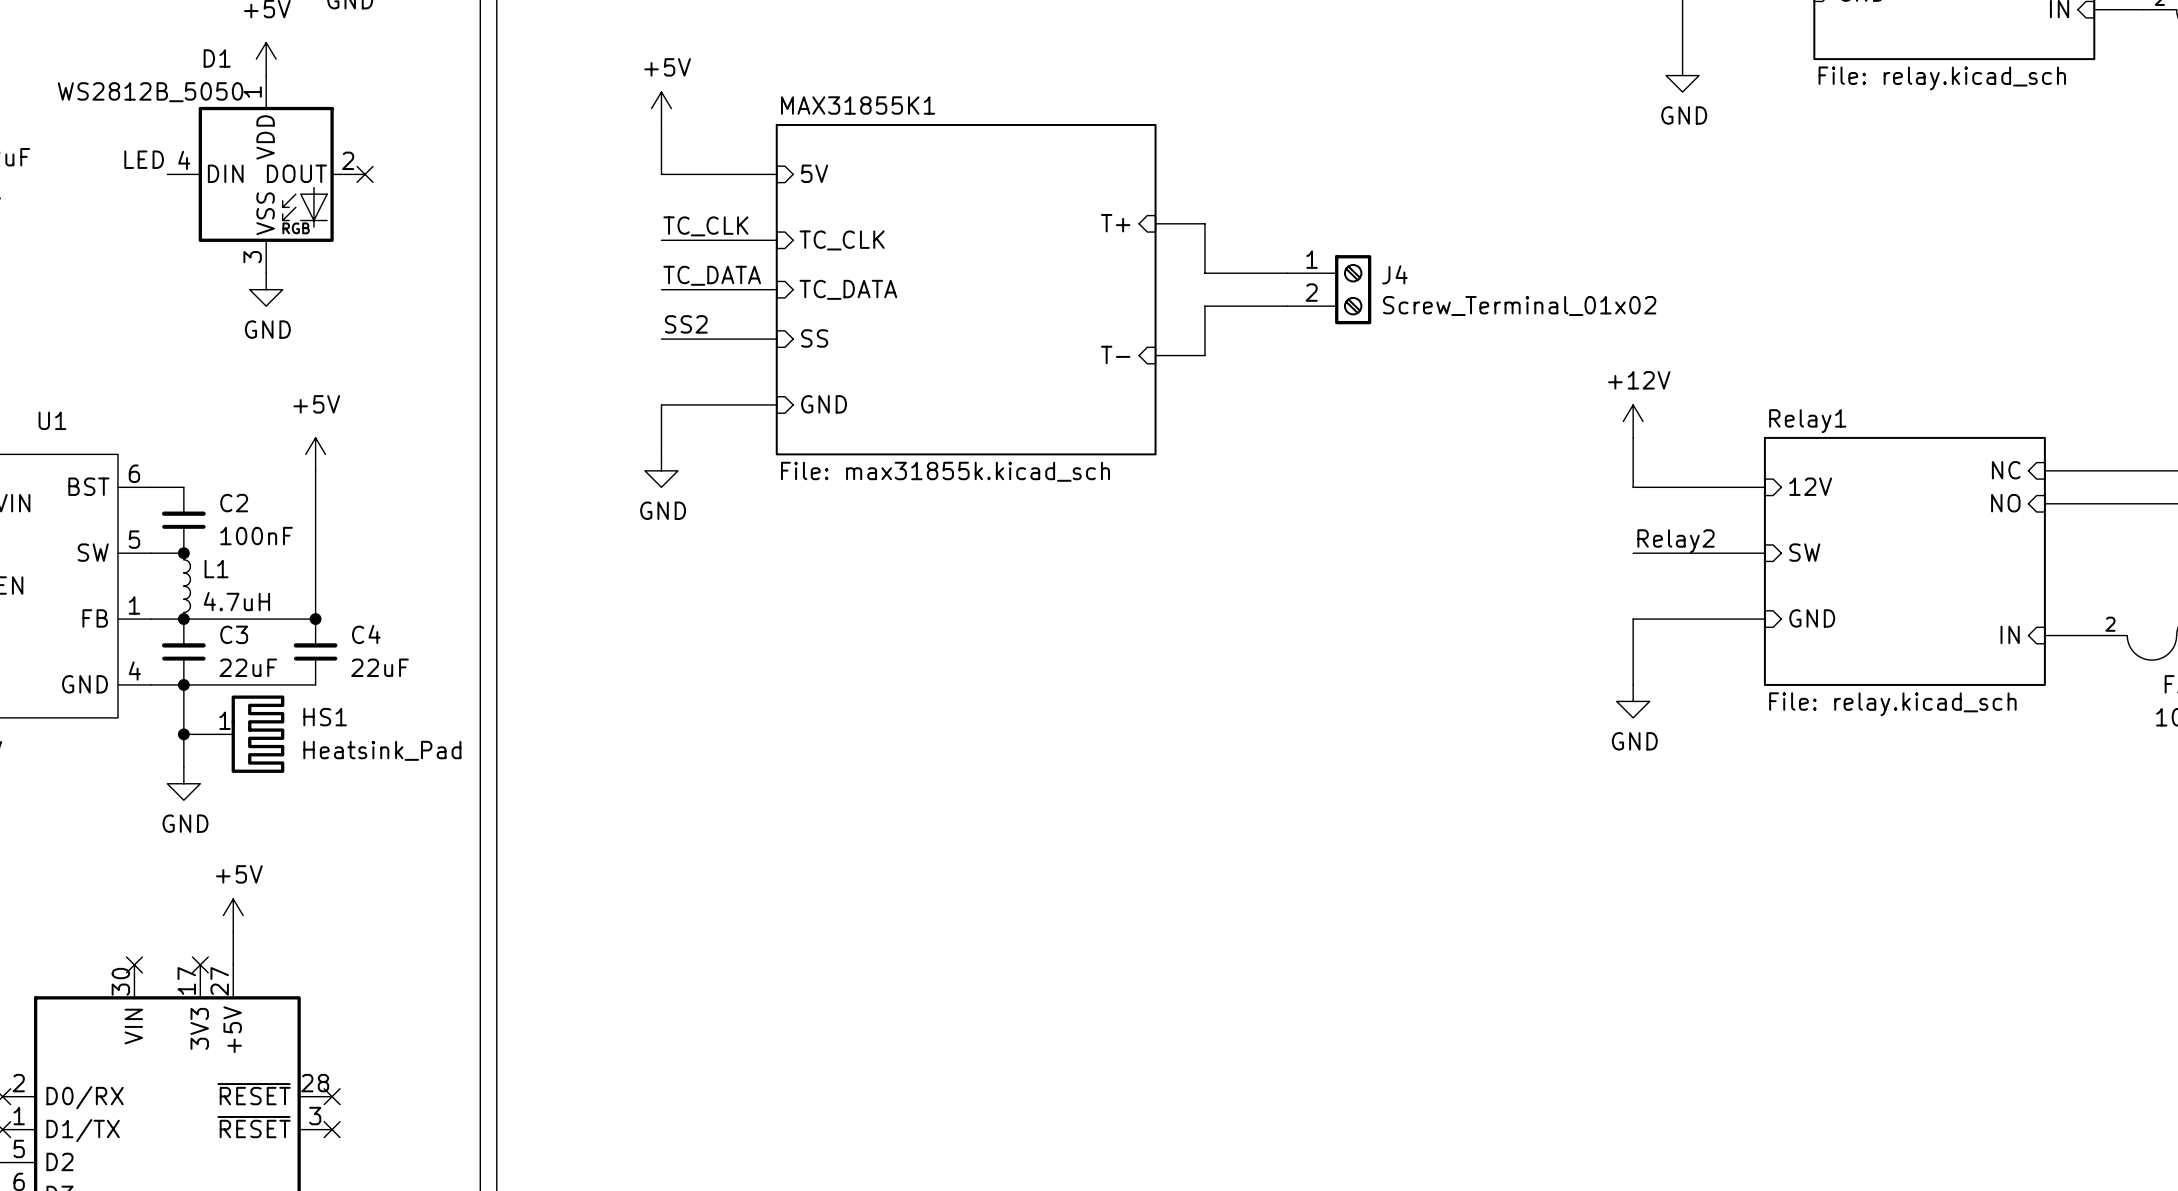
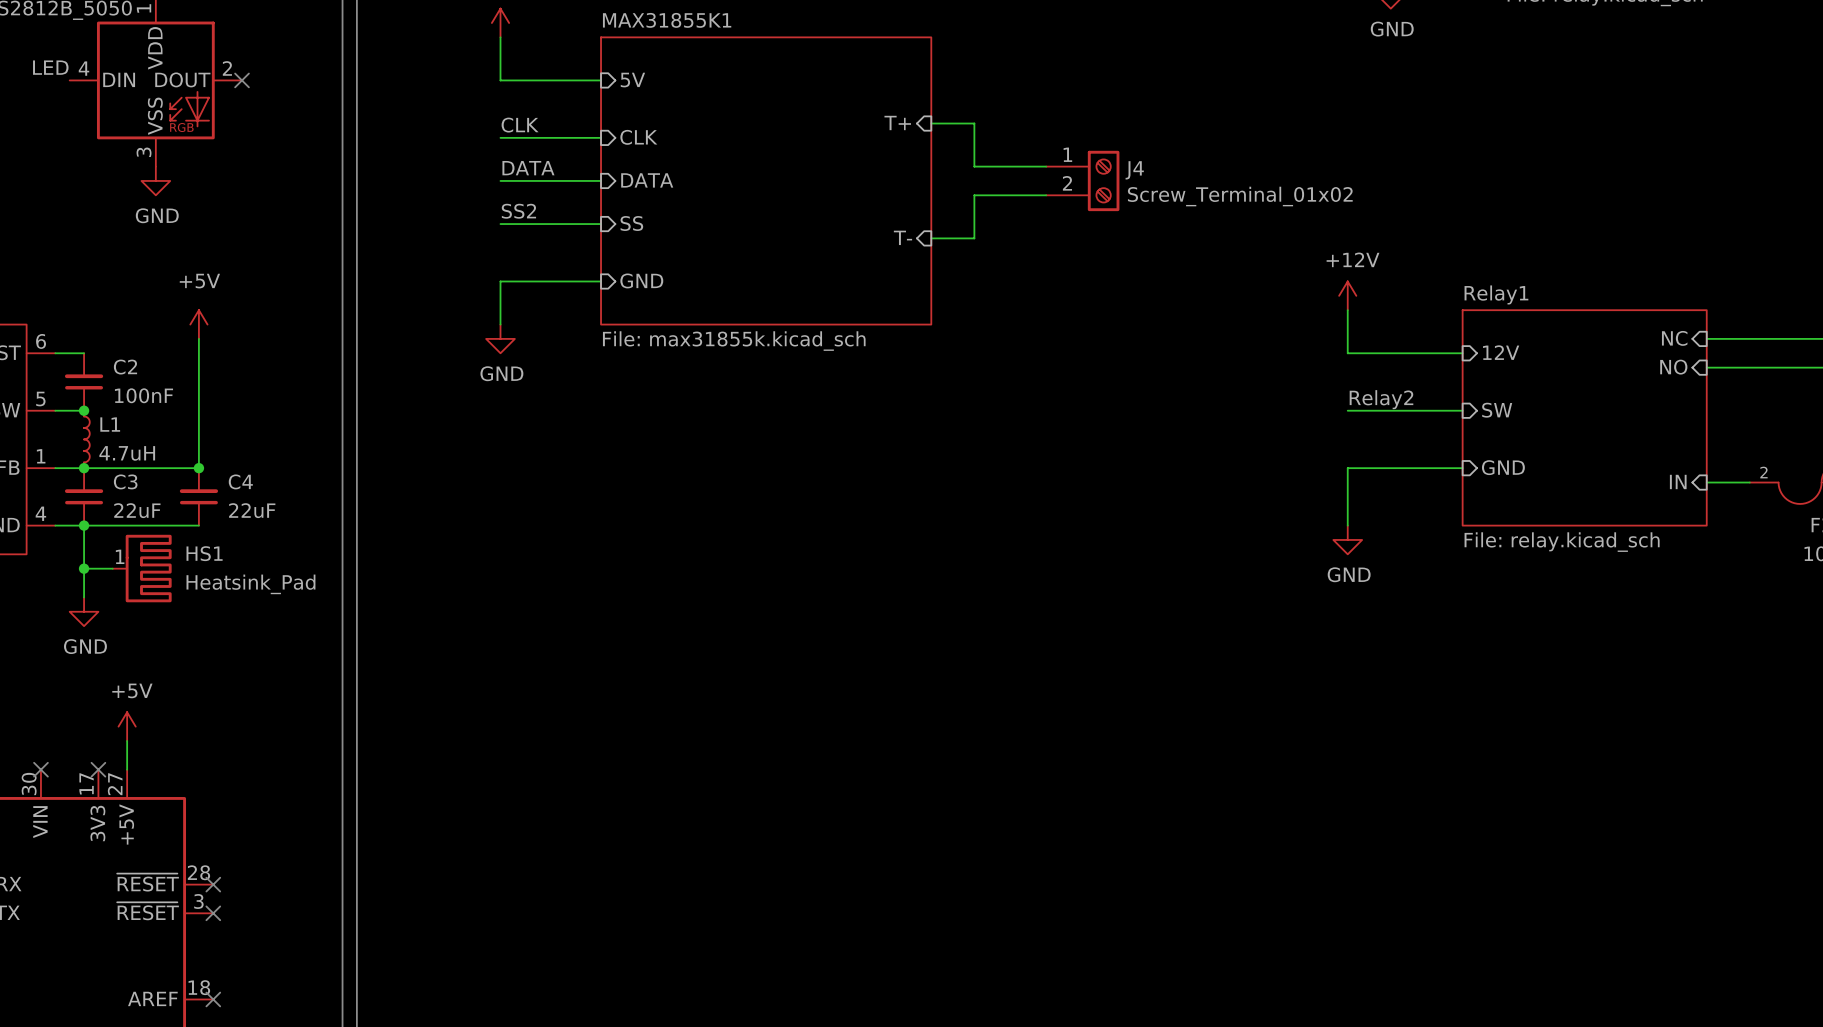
label: TC_CLK (705, 226) -> CLK (520, 125)
sheet pin: TC_CLK (842, 240) -> CLK (638, 137)
label: TC_DATA (712, 275) -> DATA (528, 168)
sheet pin: TC_DATA (848, 289) -> DATA (647, 180)

